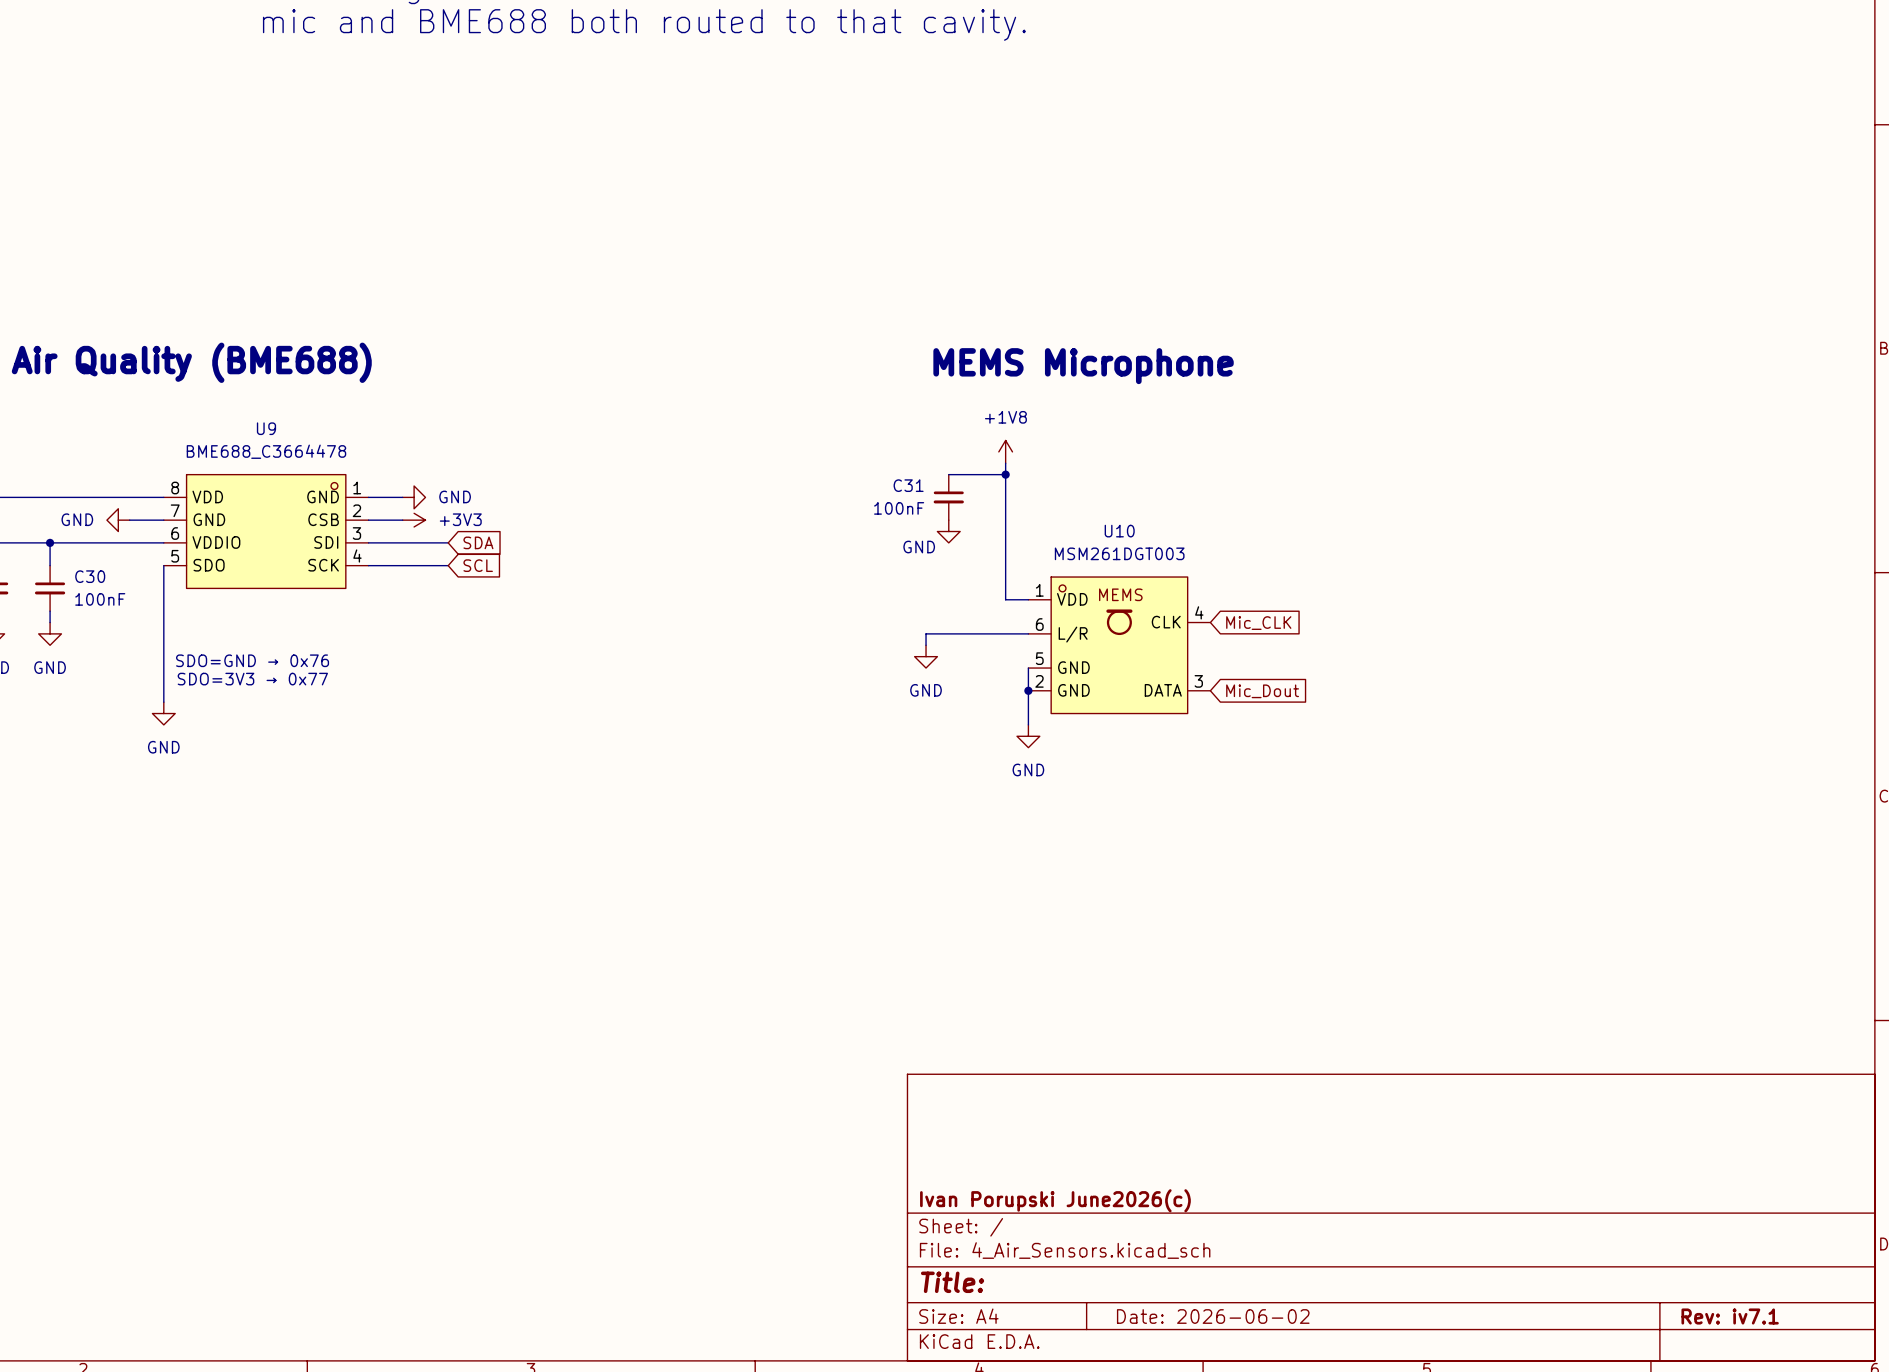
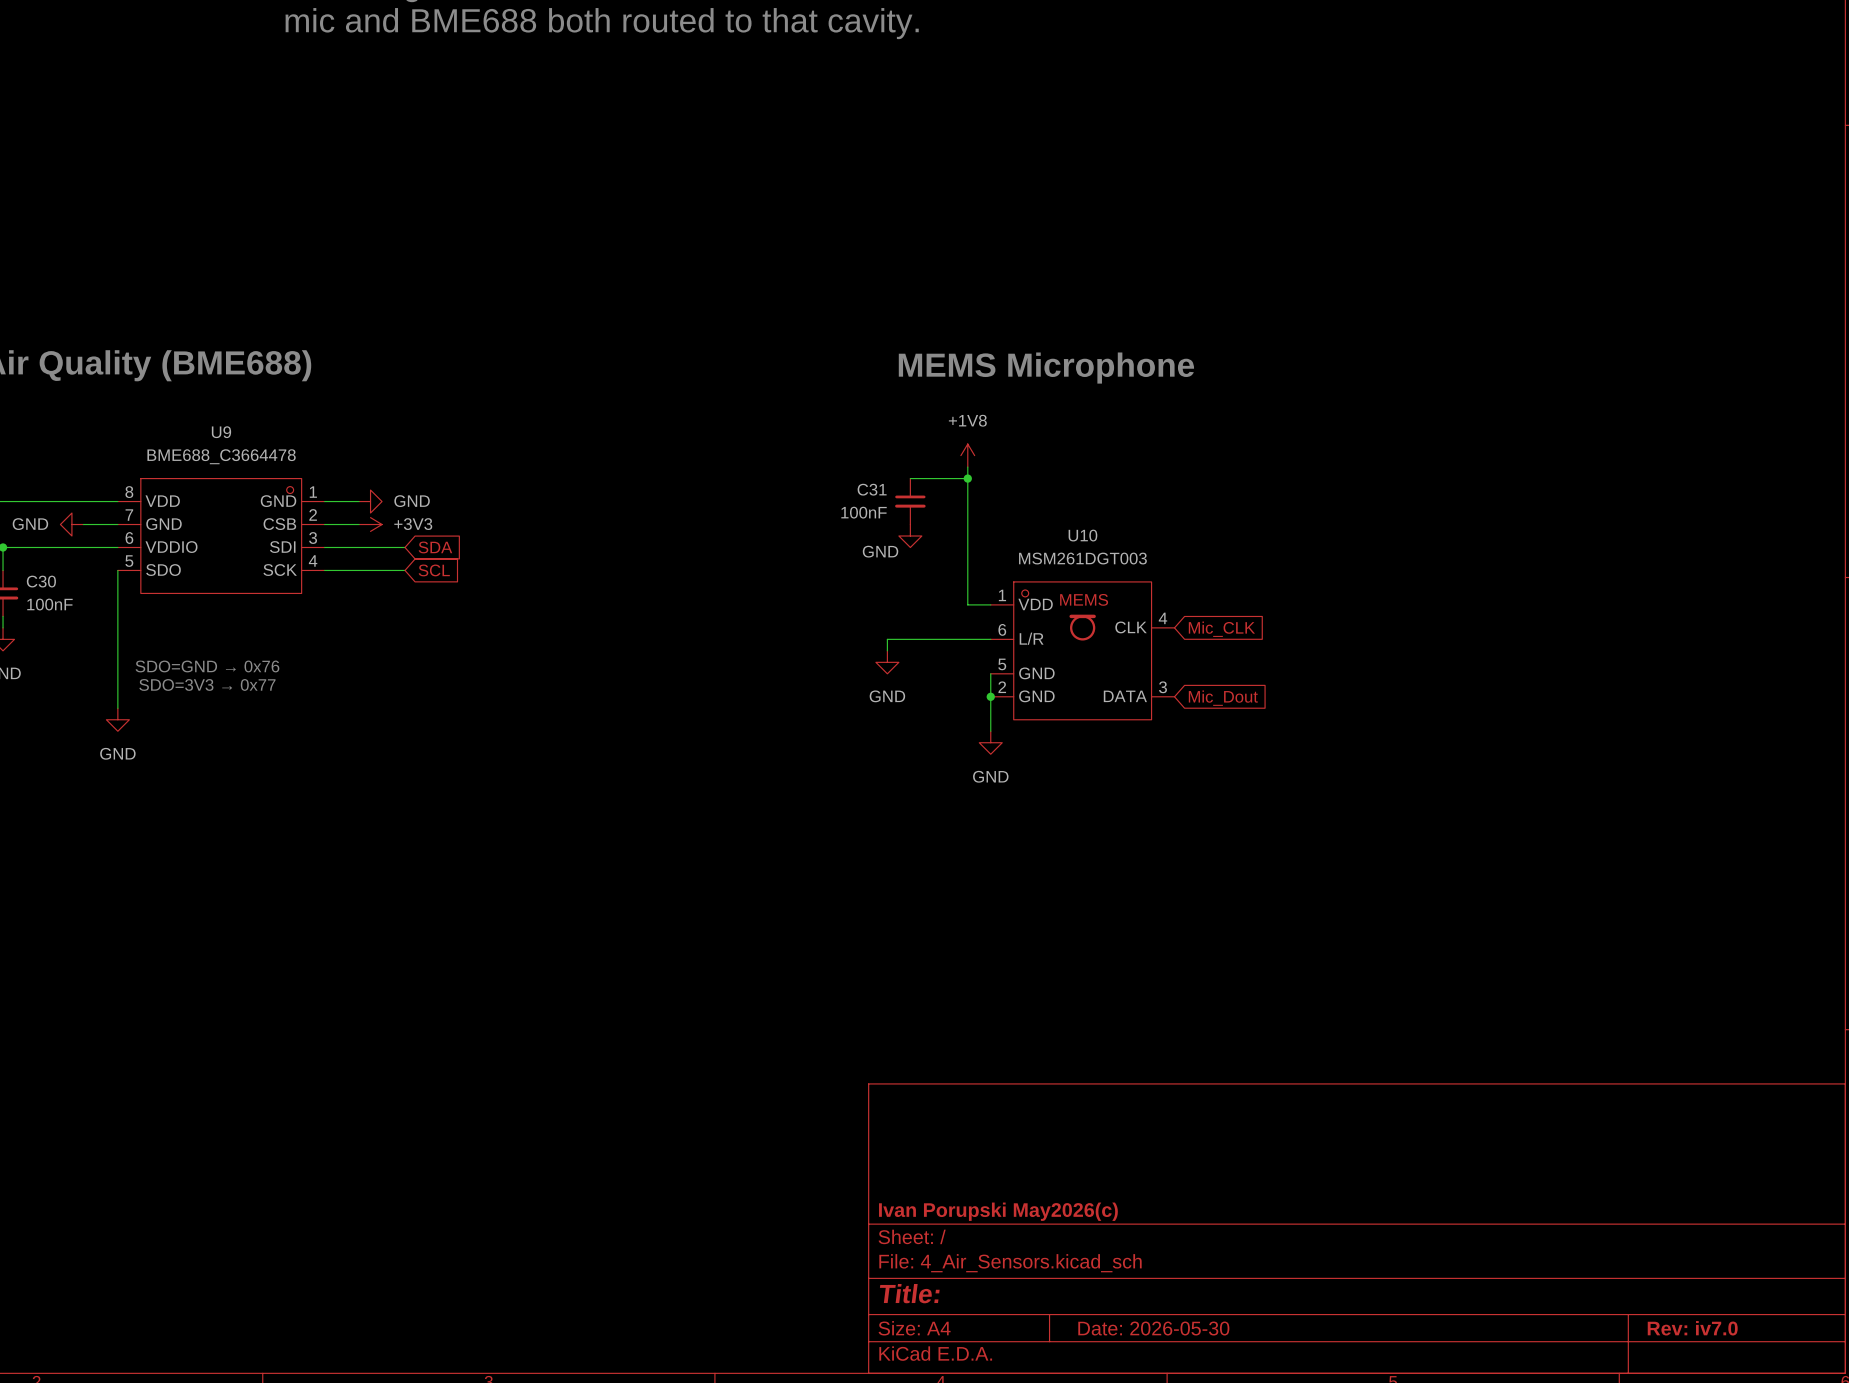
title block: Ivan Porupski June2026(c) (1055, 1200) -> Ivan Porupski May2026(c) (998, 1211)
title block: Date: 2026-06-02 (1213, 1316) -> Date: 2026-05-30 (1153, 1328)
title block: Rev: iv7.1 (1730, 1316) -> Rev: iv7.0 (1692, 1328)

